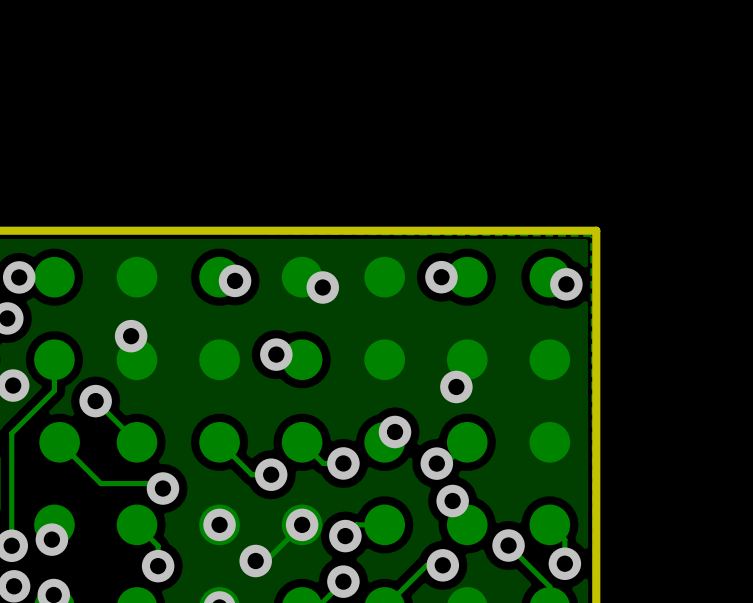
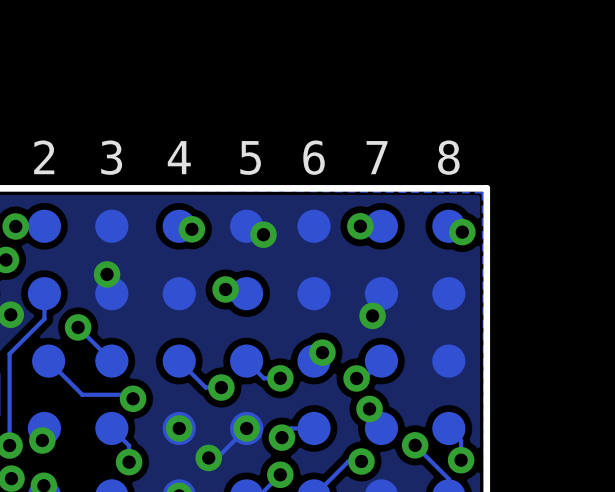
text: none -> 2 (44, 157)
text: none -> 3 (111, 157)
text: none -> 4 (179, 157)
text: none -> 5 (250, 157)
text: none -> 6 (314, 157)
text: none -> 7 (377, 157)
text: none -> 8 (448, 157)

